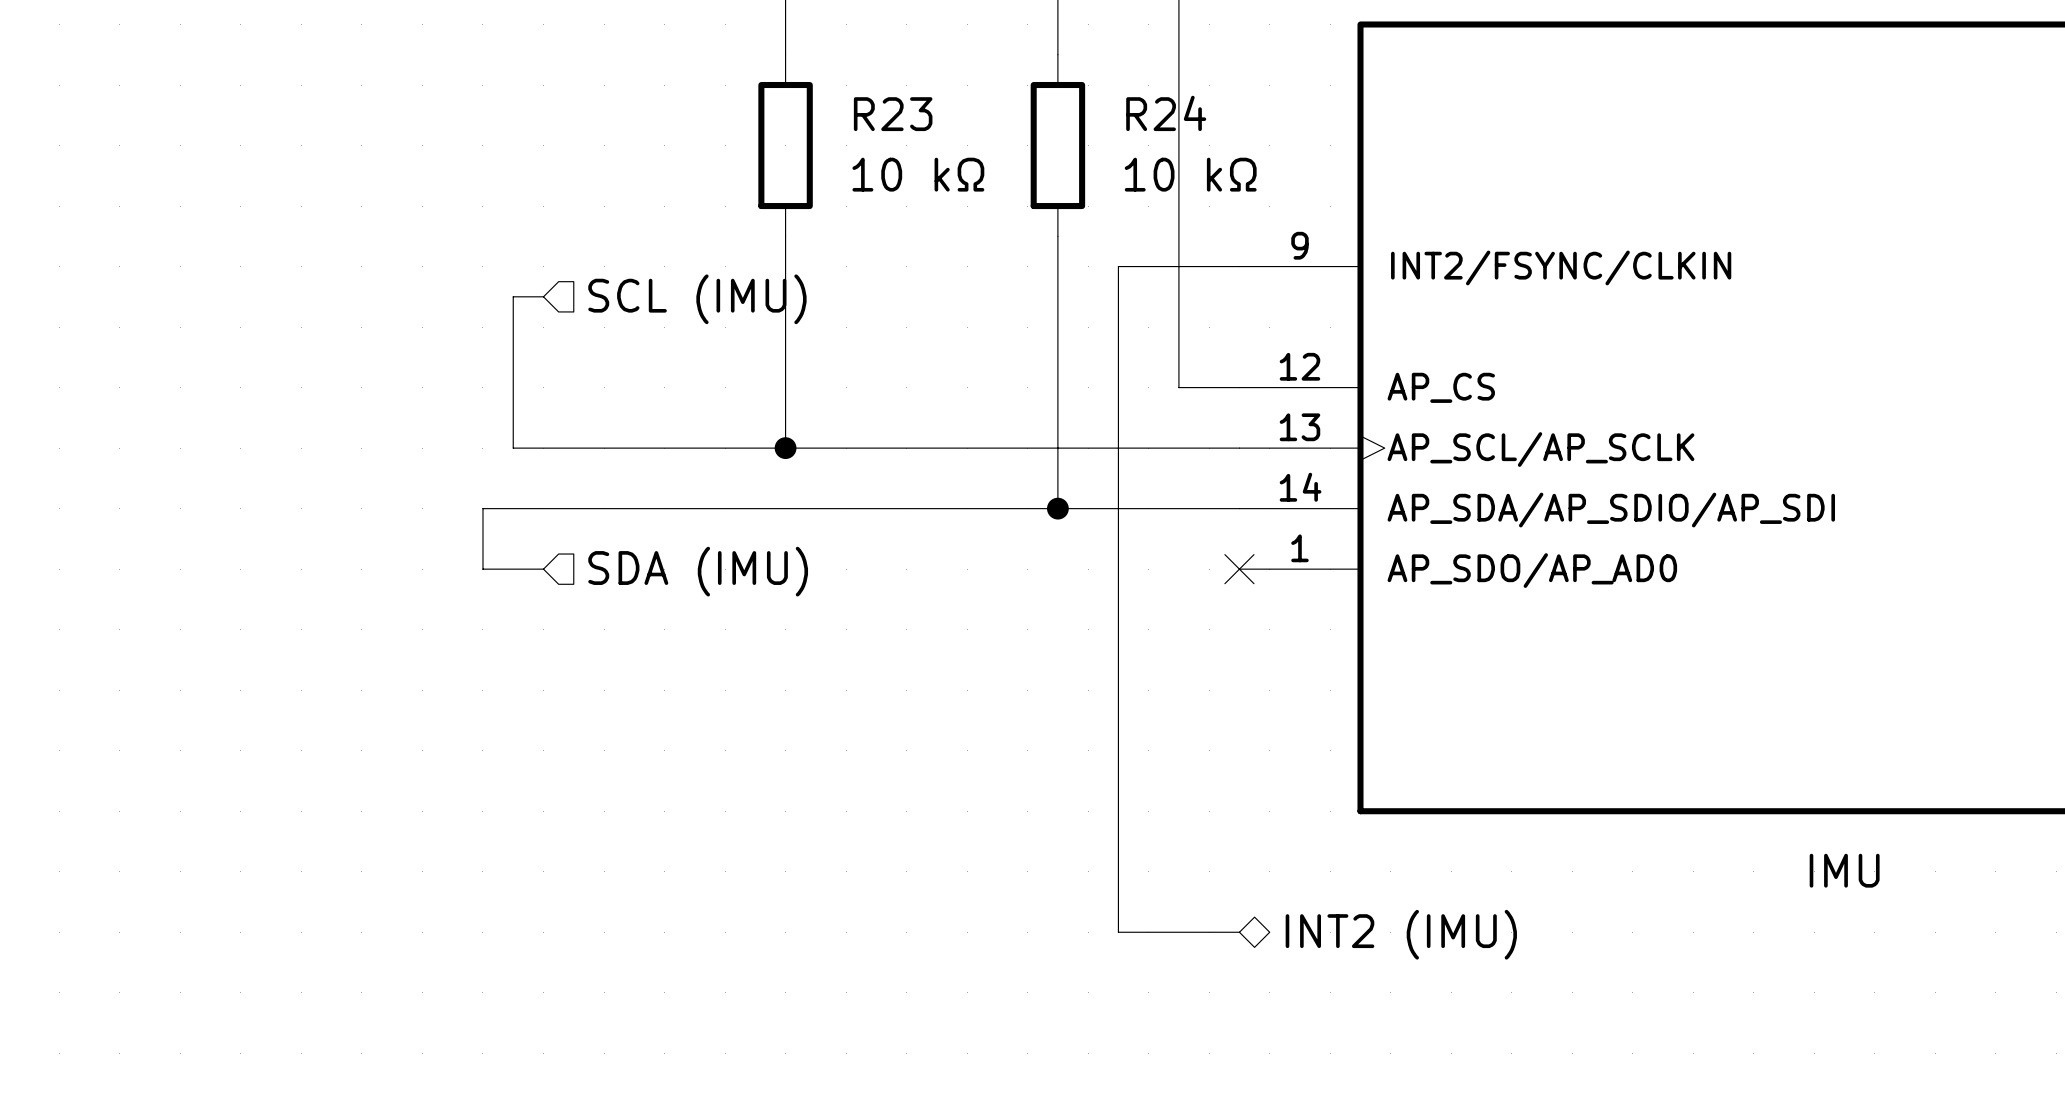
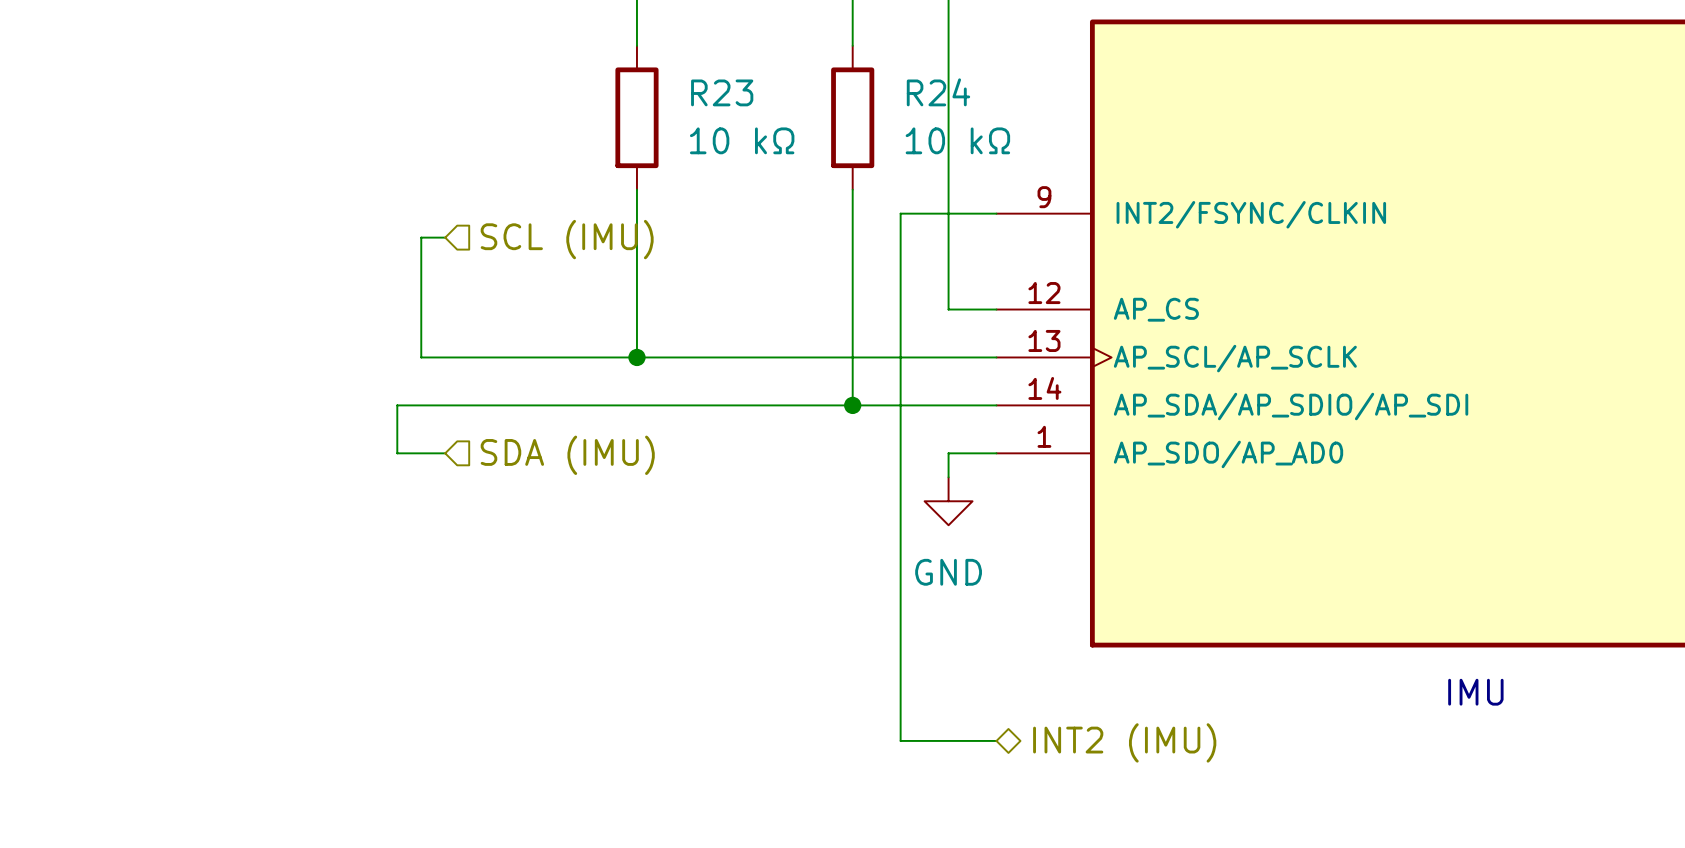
wire: none -> (996, 453) (948, 453) (948, 477)
no-connect mark: (1239, 569) -> none
power symbol: none -> GND (948, 501)

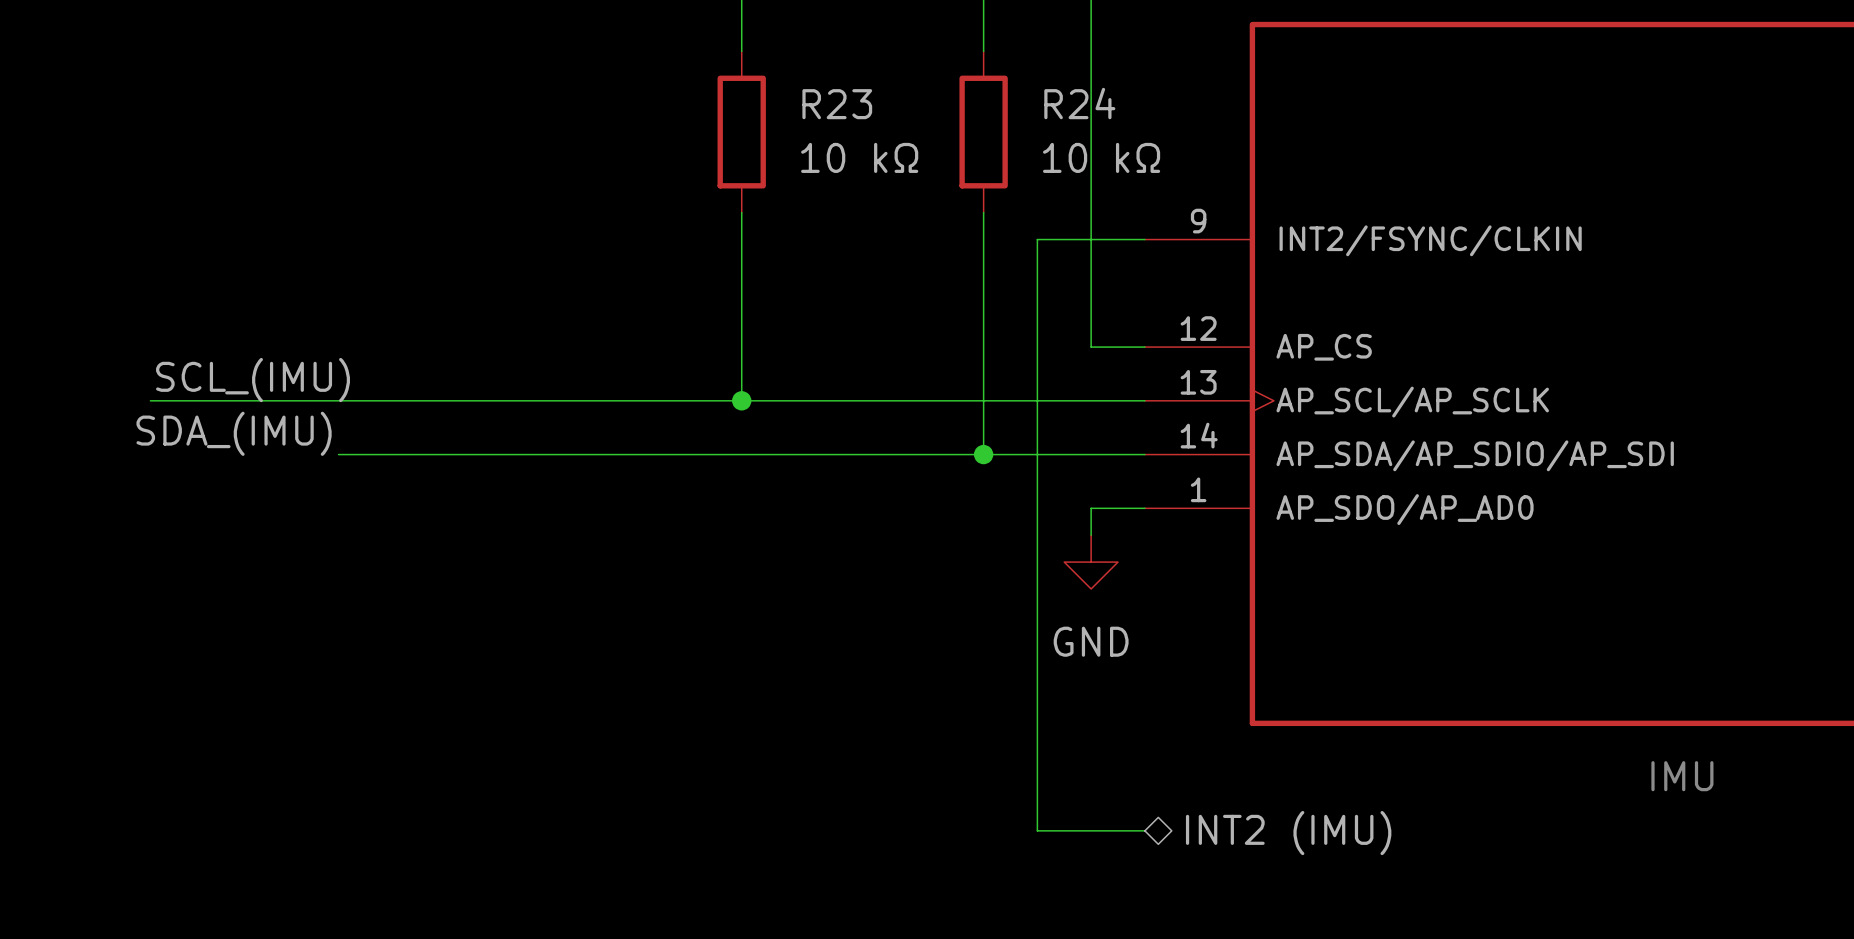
wire: (445, 237) (421, 237) (421, 357) -> (150, 400) (499, 400)
hierarchical label: SCL (IMU) (567, 239) -> none
label: none -> SCL_(IMU) (253, 380)
label: none -> SDA_(IMU) (234, 433)
wire: (397, 405) (397, 453) (445, 453) -> (472, 454) (338, 454)
hierarchical label: SDA (IMU) (567, 455) -> none

